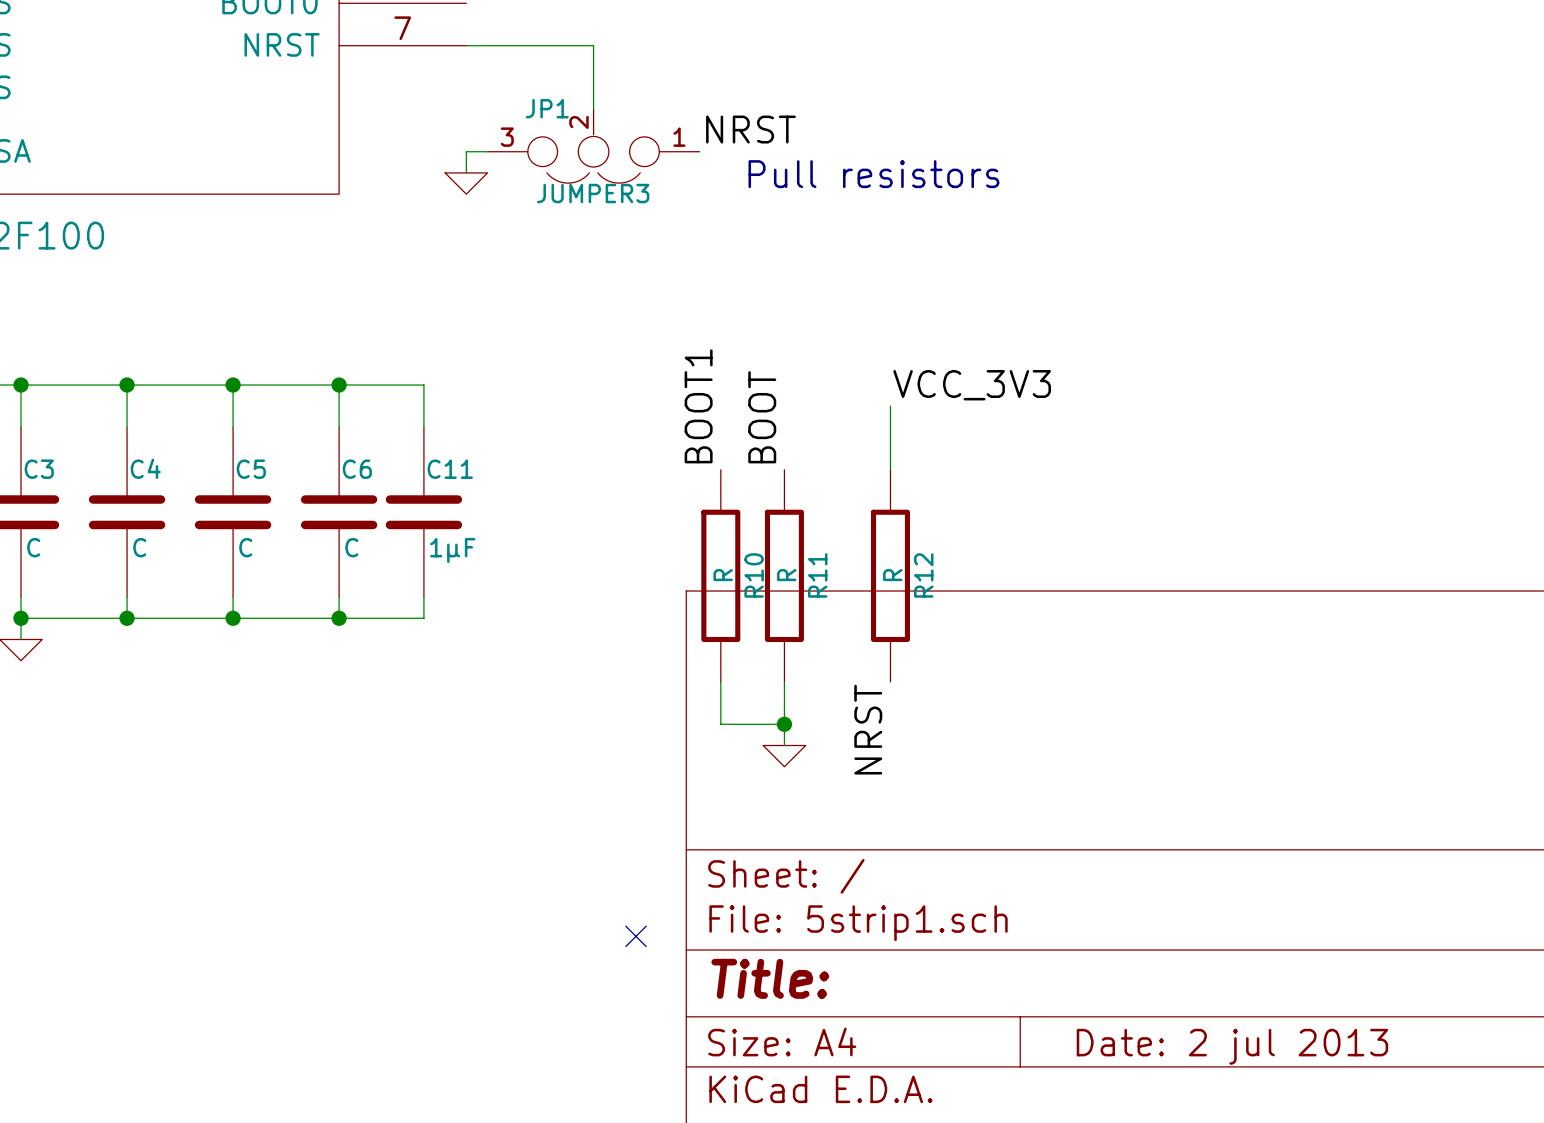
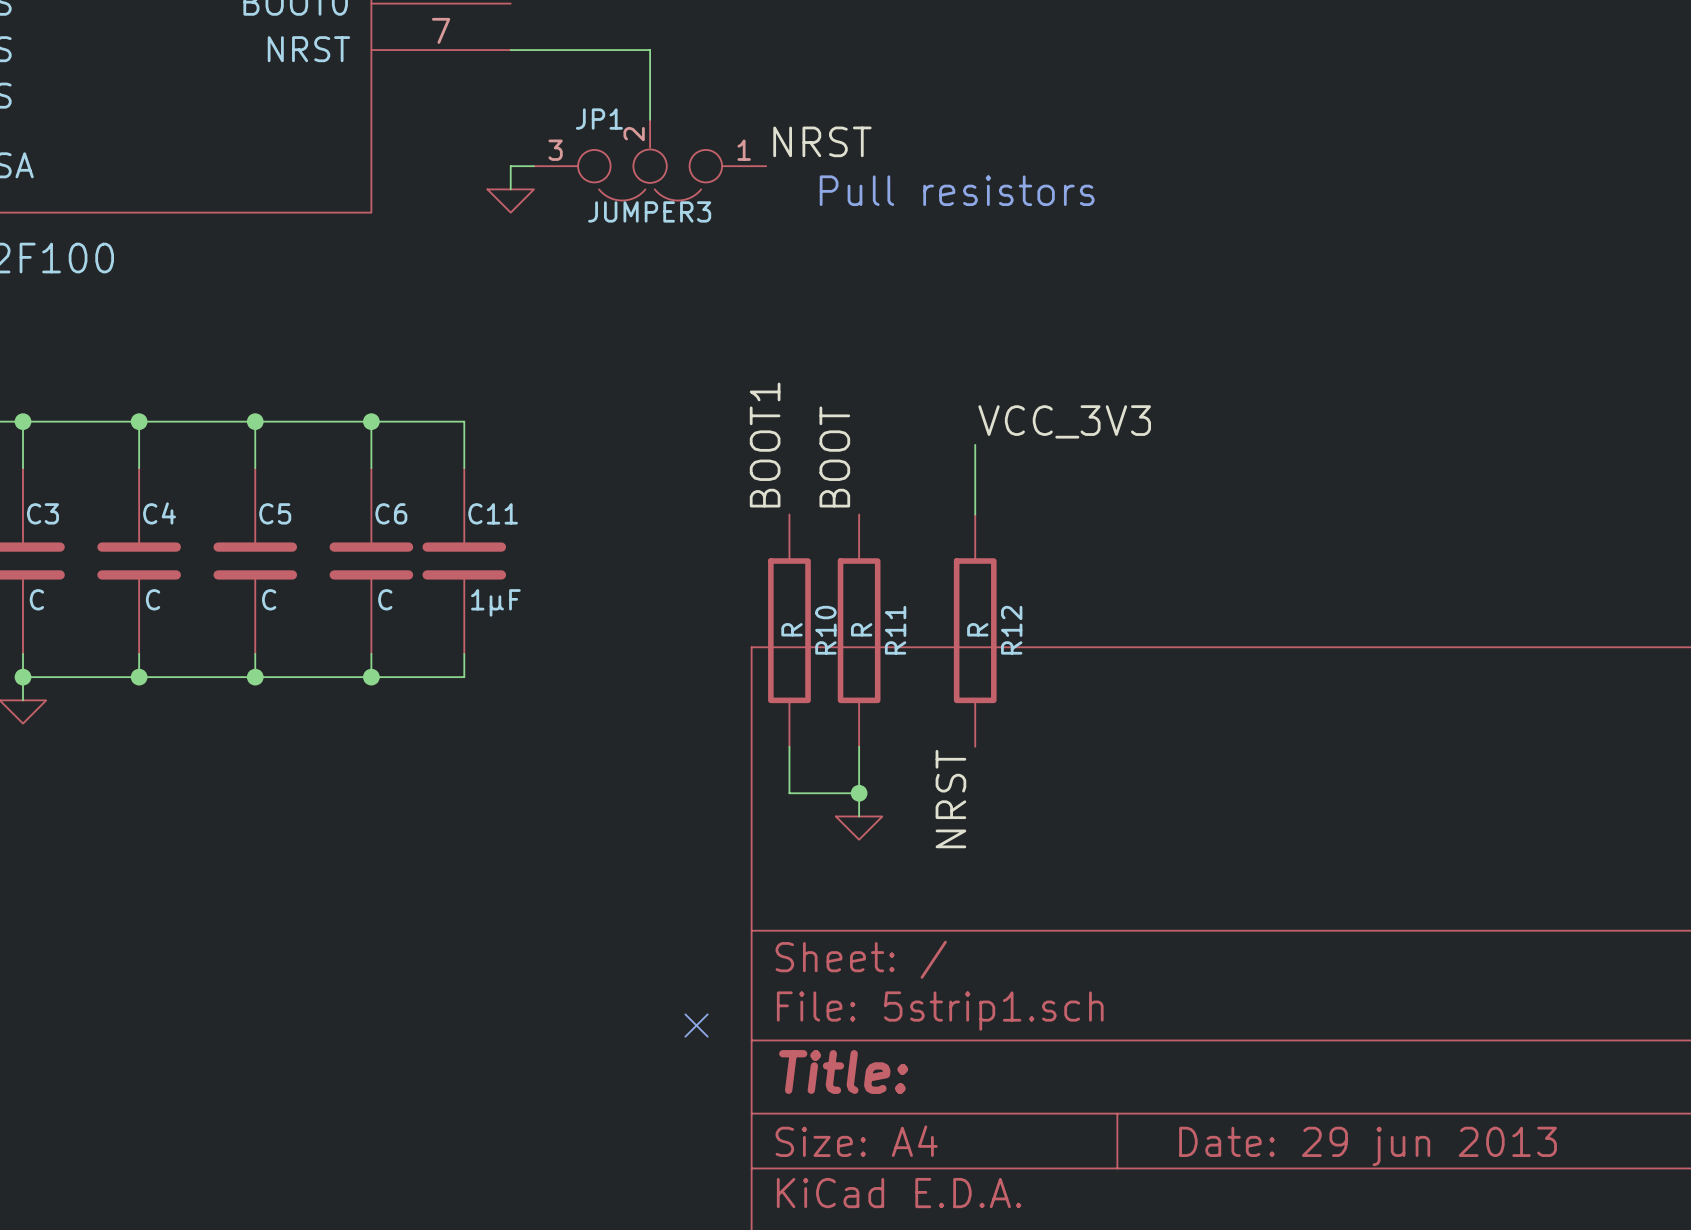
title block: Date: 2 jul 2013 (1232, 1046) -> Date: 29 jun 2013 (1368, 1146)

